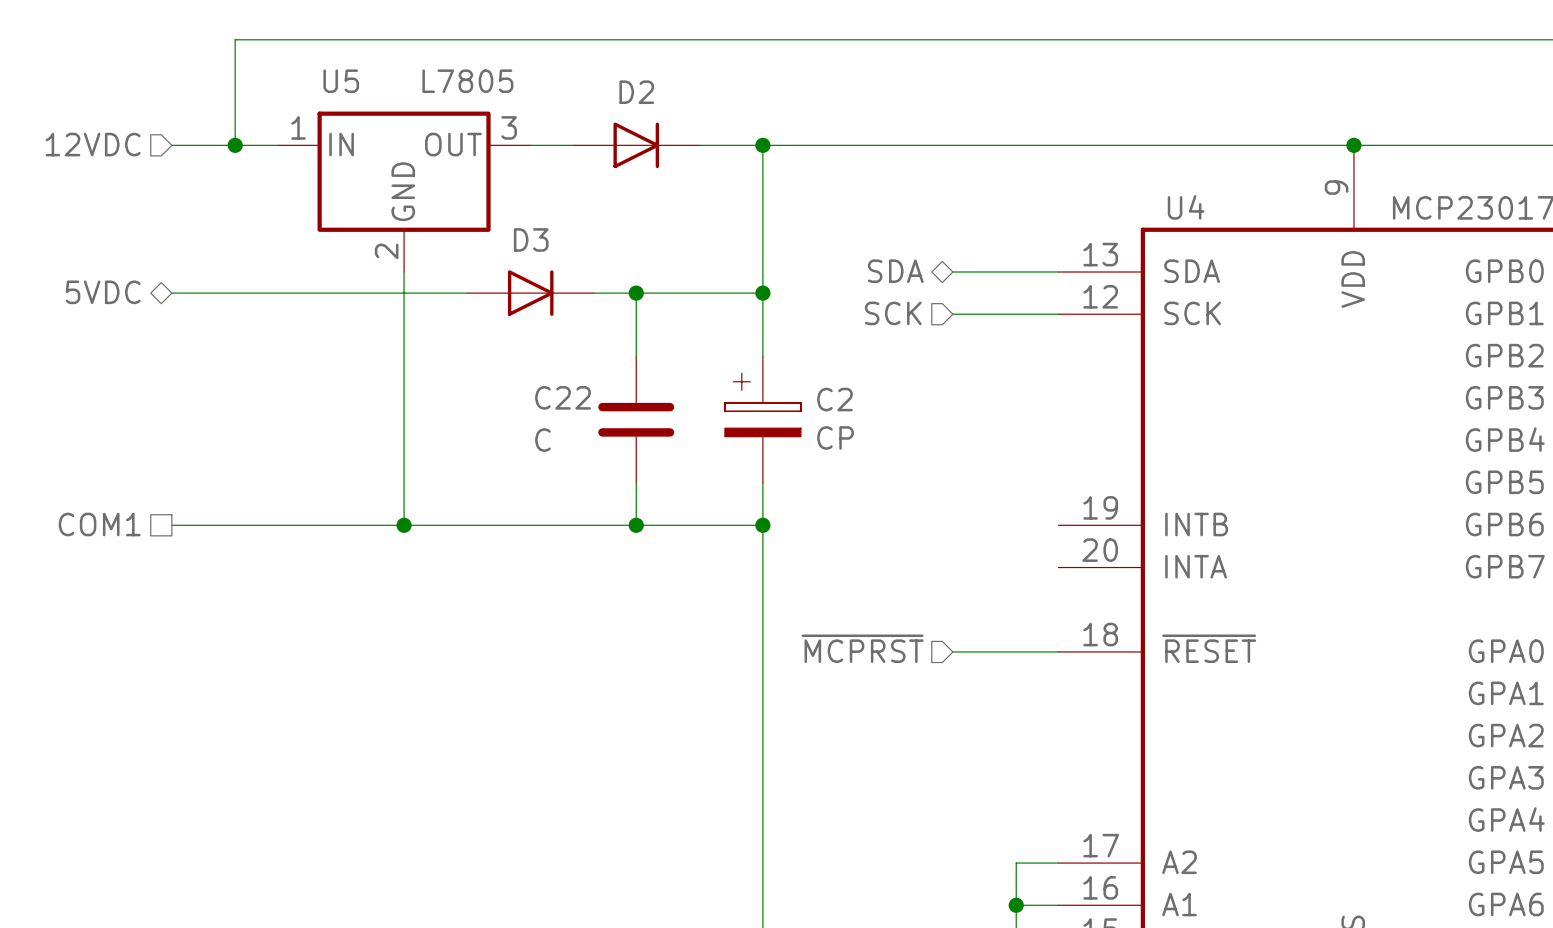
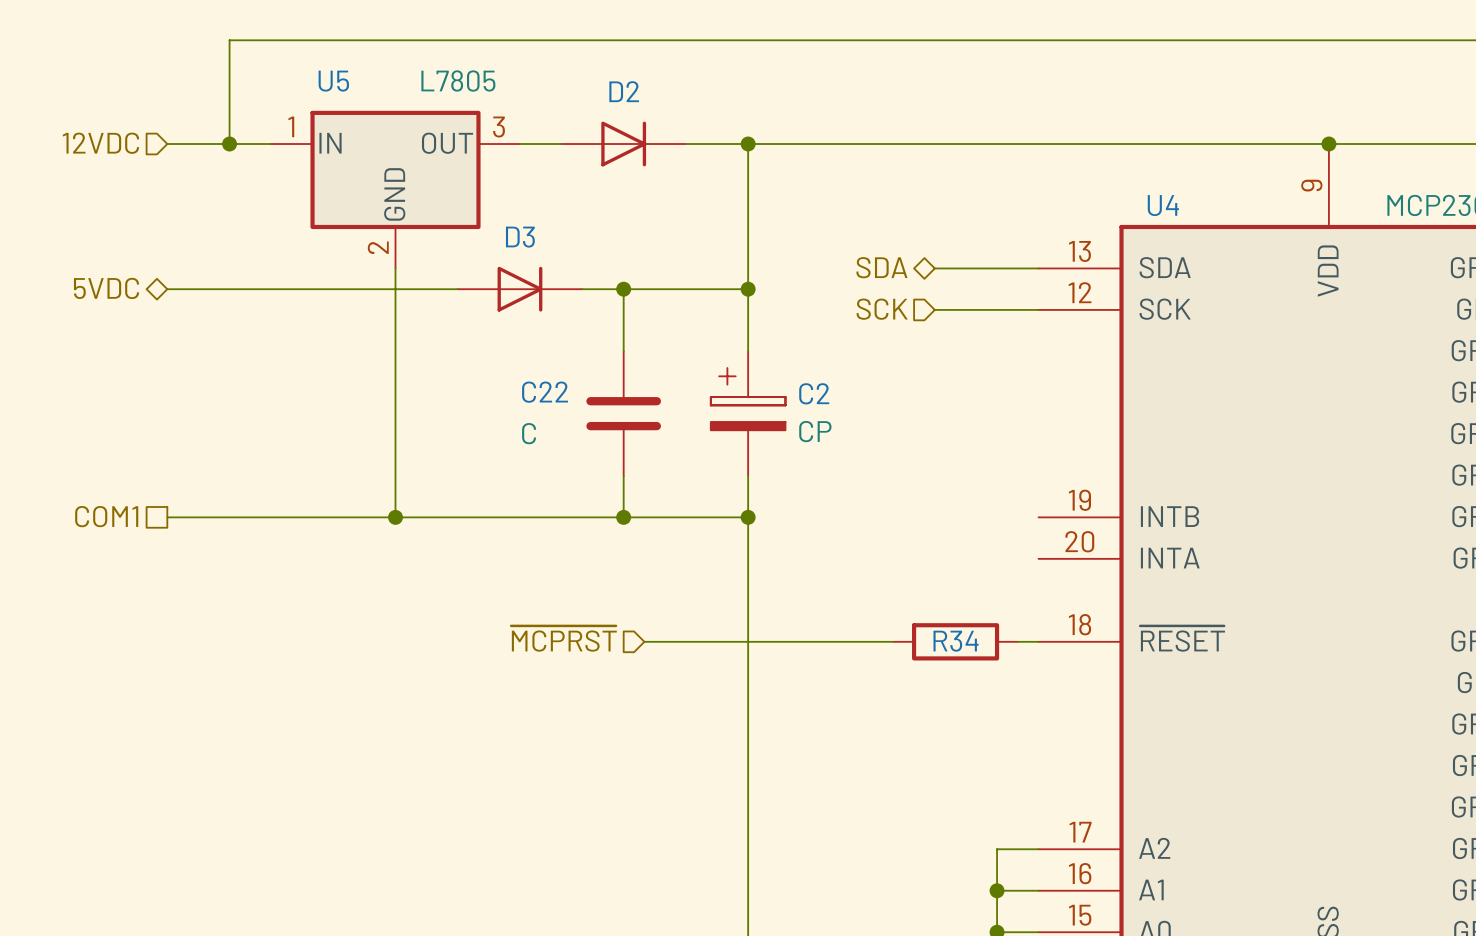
hierarchical label position: ~{MCPRST} (862, 648) -> ~{MCPRST} (563, 638)
wire: none -> (644, 641) (893, 641)
wire: (952, 651) (1037, 651) -> none
R34: none -> (955, 641)

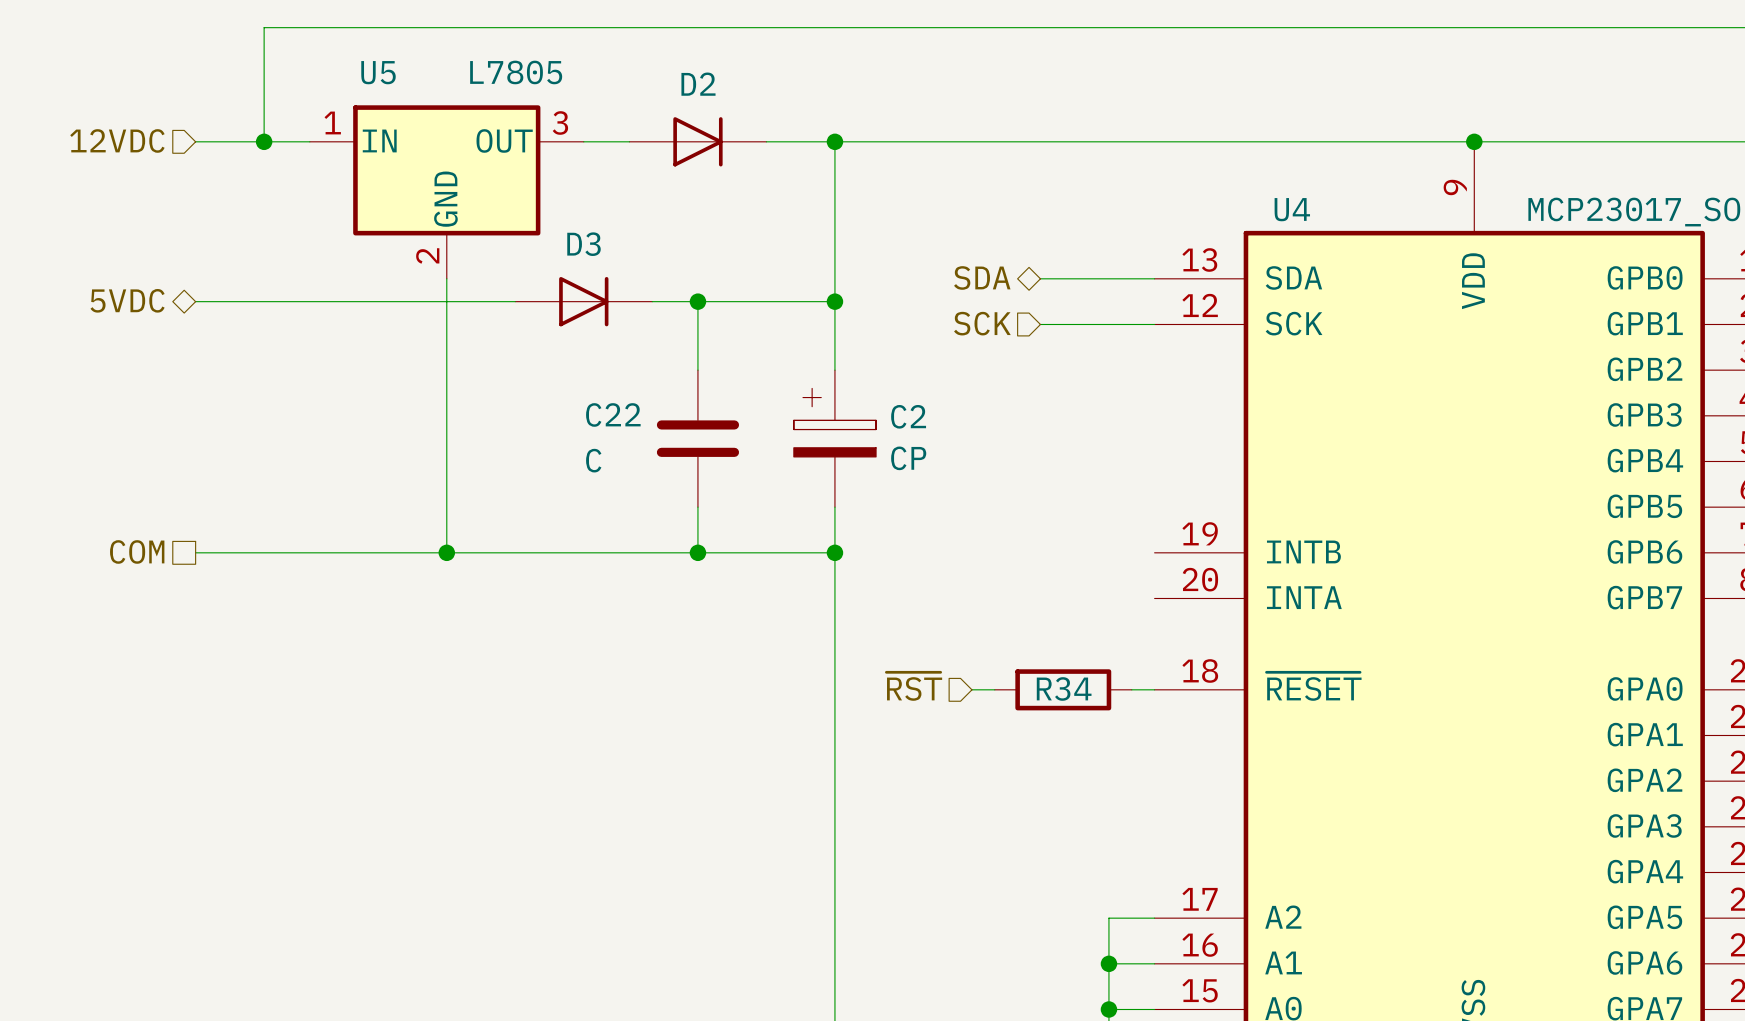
hierarchical label: COM1 (106, 516) -> COM (137, 551)
hierarchical label: ~{MCPRST} (563, 638) -> none
hierarchical label: none -> ~{RST} (914, 686)
wire: (644, 641) (872, 641) -> none

